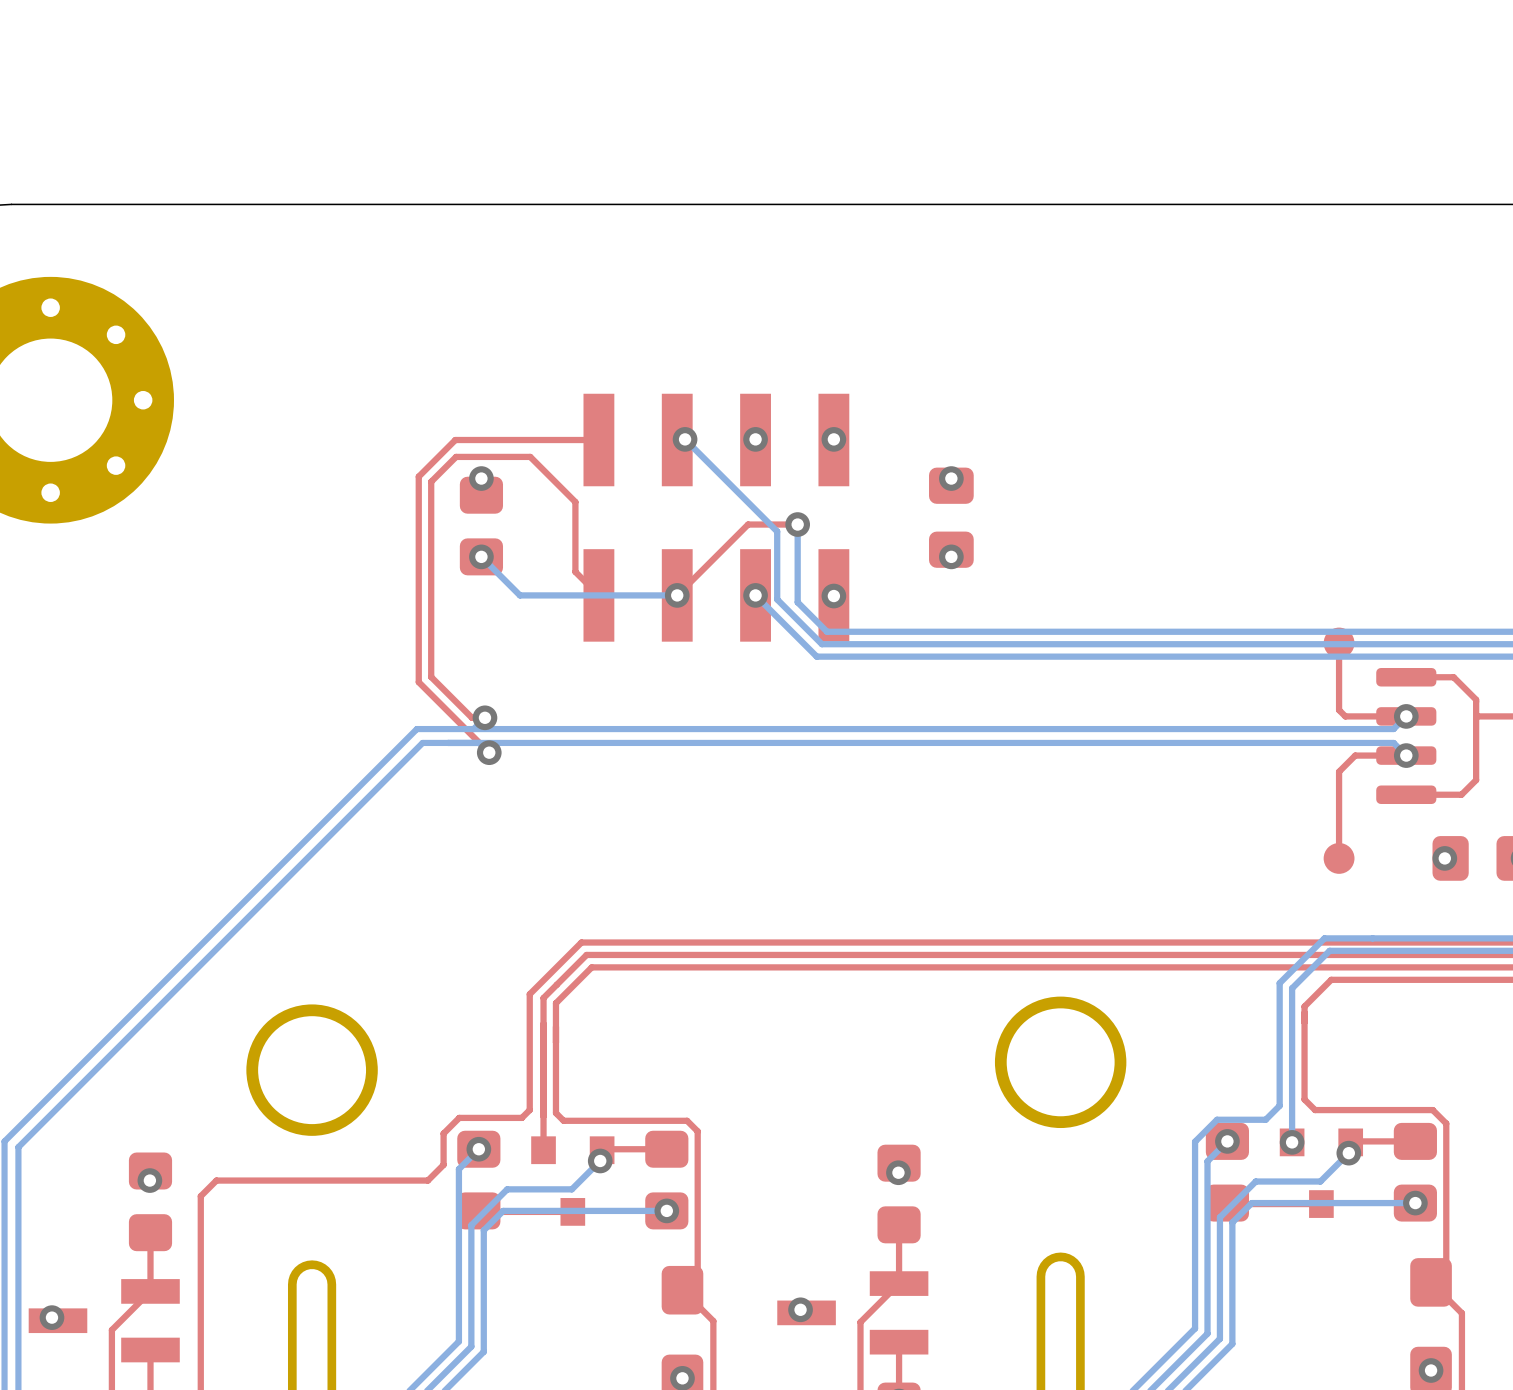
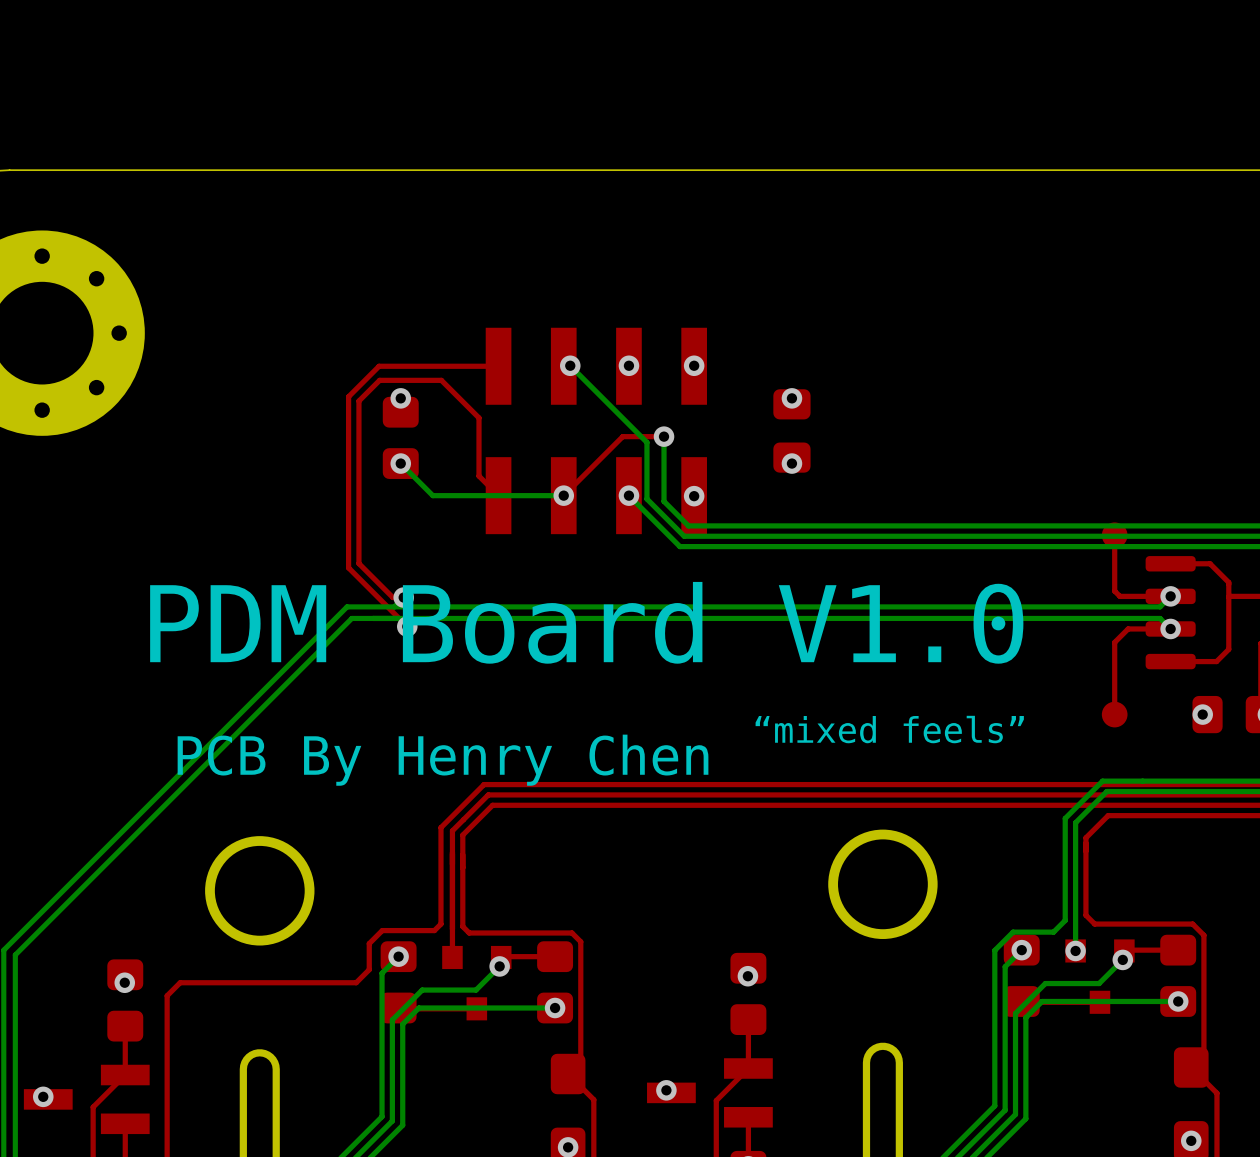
text: none -> PDM Board V1.0 (586, 622)
text: none -> “mixed feels” (889, 729)
text: none -> PCB By Henry Chen (443, 760)

